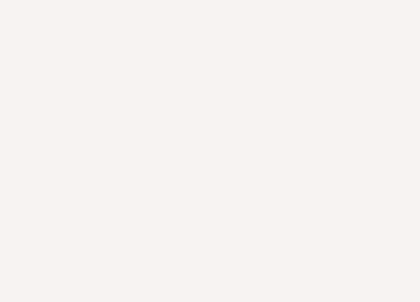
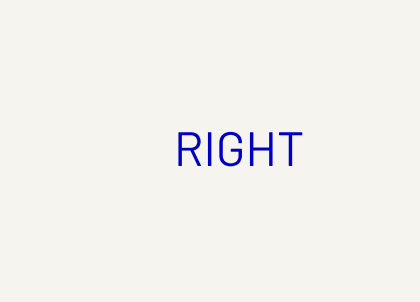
text: none -> RIGHT (240, 149)

